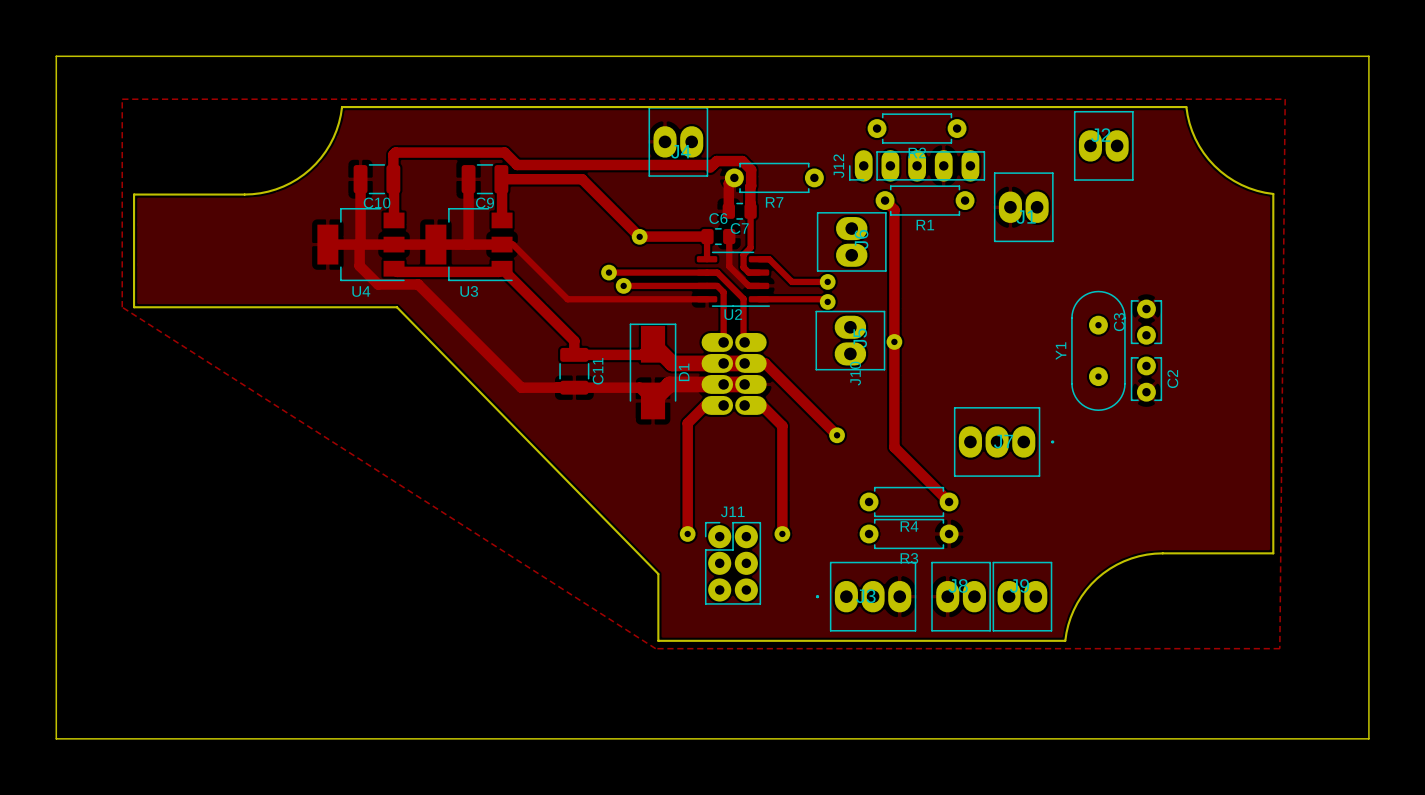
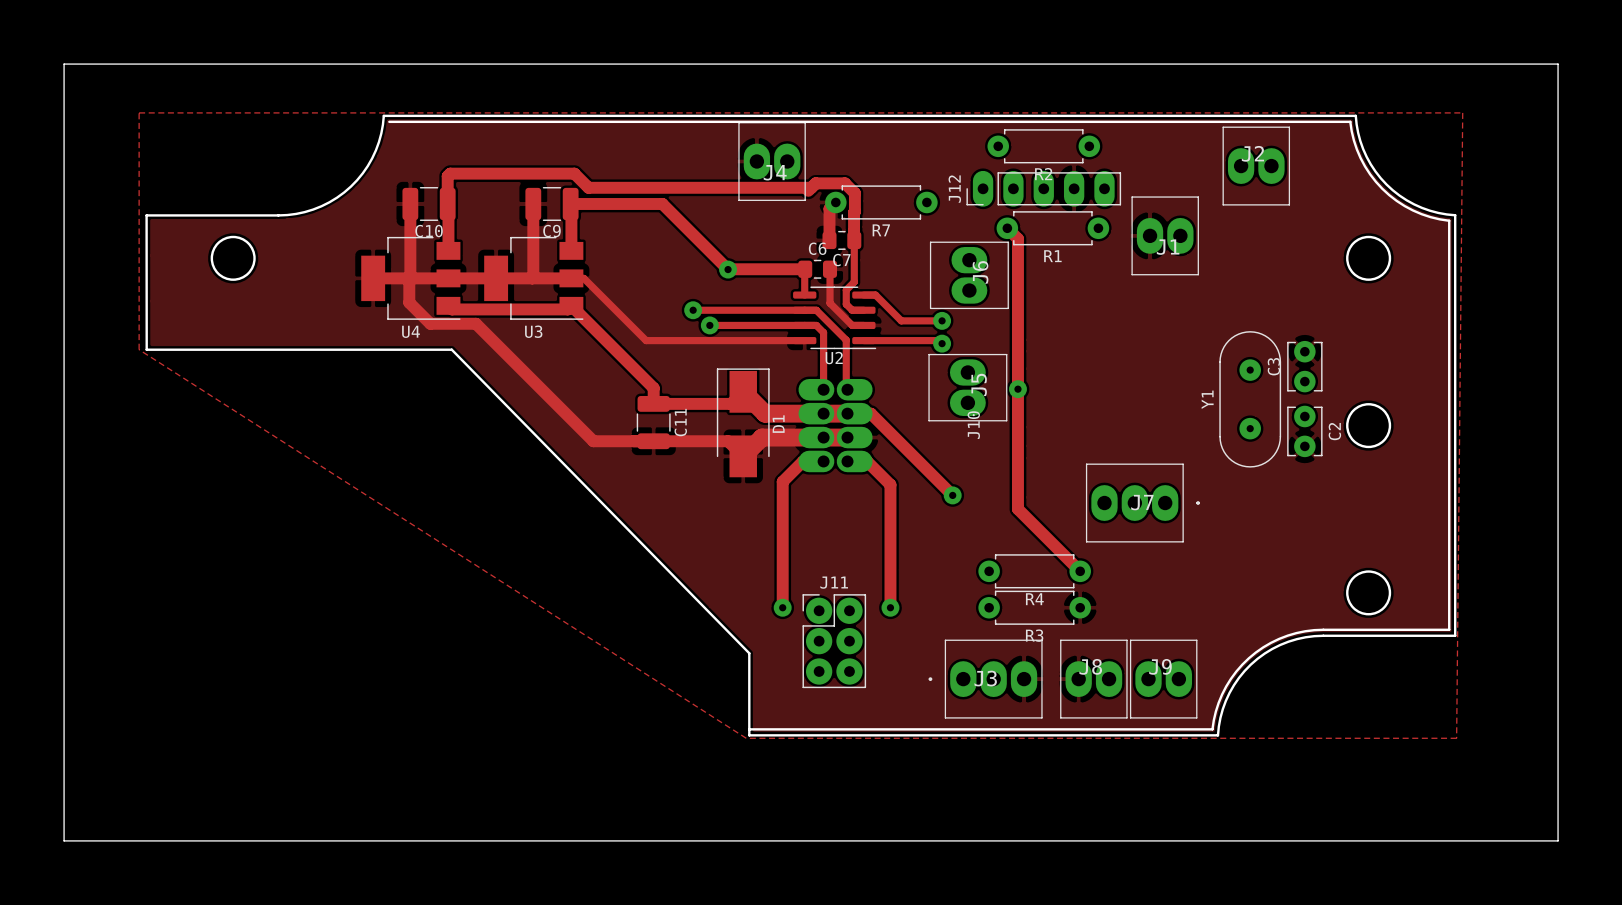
board edge: (342, 107) (336, 130) (325, 151) (303, 174) (283, 186) (252, 194) (134, 194) (134, 307) -> (749, 729) (749, 735) (1217, 735) (1222, 709) (1239, 677) (1257, 658) (1280, 644) (1314, 636) (1455, 635) (1455, 215) (1438, 212) (1414, 204) (1386, 184) (1370, 164) (1363, 149) (1355, 115) (383, 115) (378, 141) (362, 173) (344, 192) (321, 206) (287, 215) (146, 215) (146, 349) (152, 349)
round board edge: none -> [210, 235, 256, 281]
round board edge: none -> [1346, 235, 1392, 281]
round board edge: none -> [1346, 403, 1392, 449]
round board edge: none -> [1346, 570, 1392, 616]

